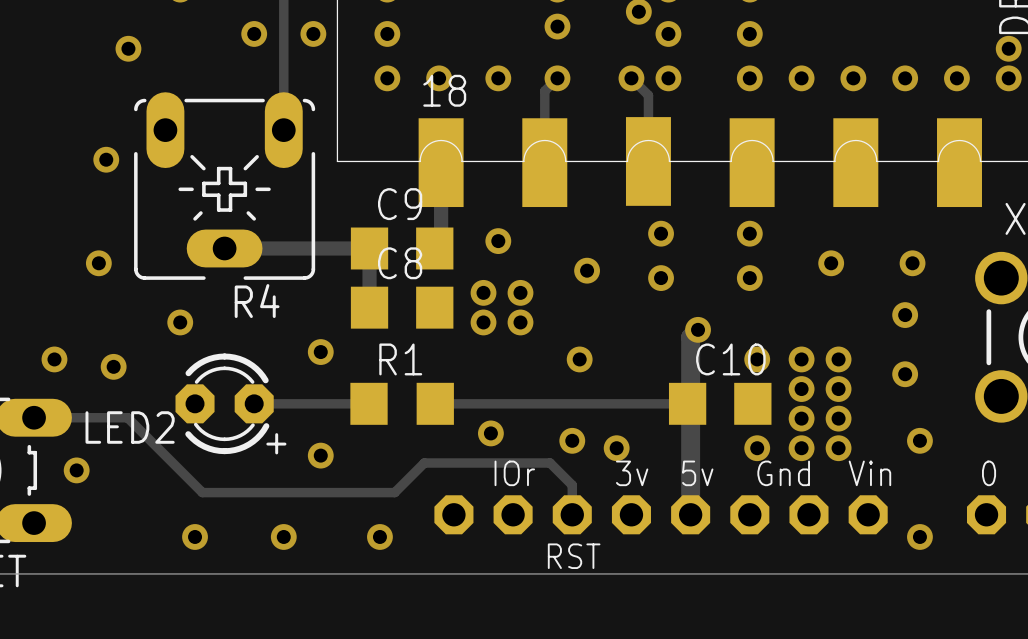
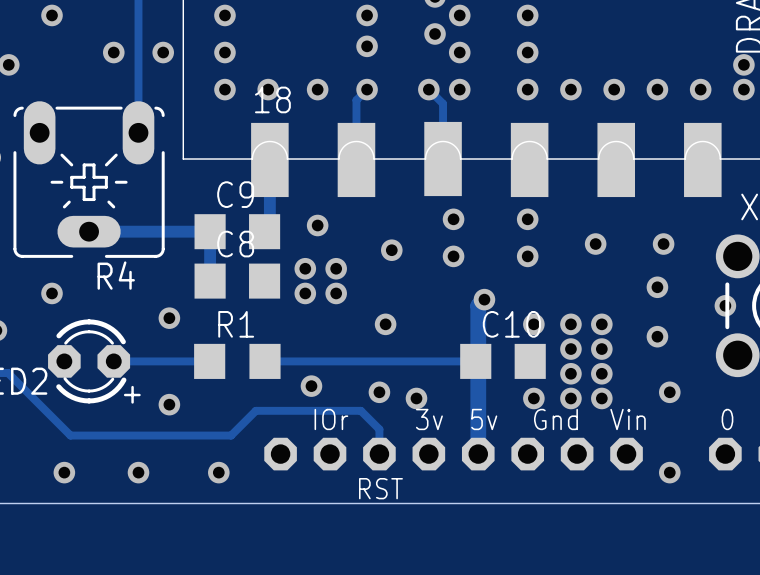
via: none -> (725, 305)

